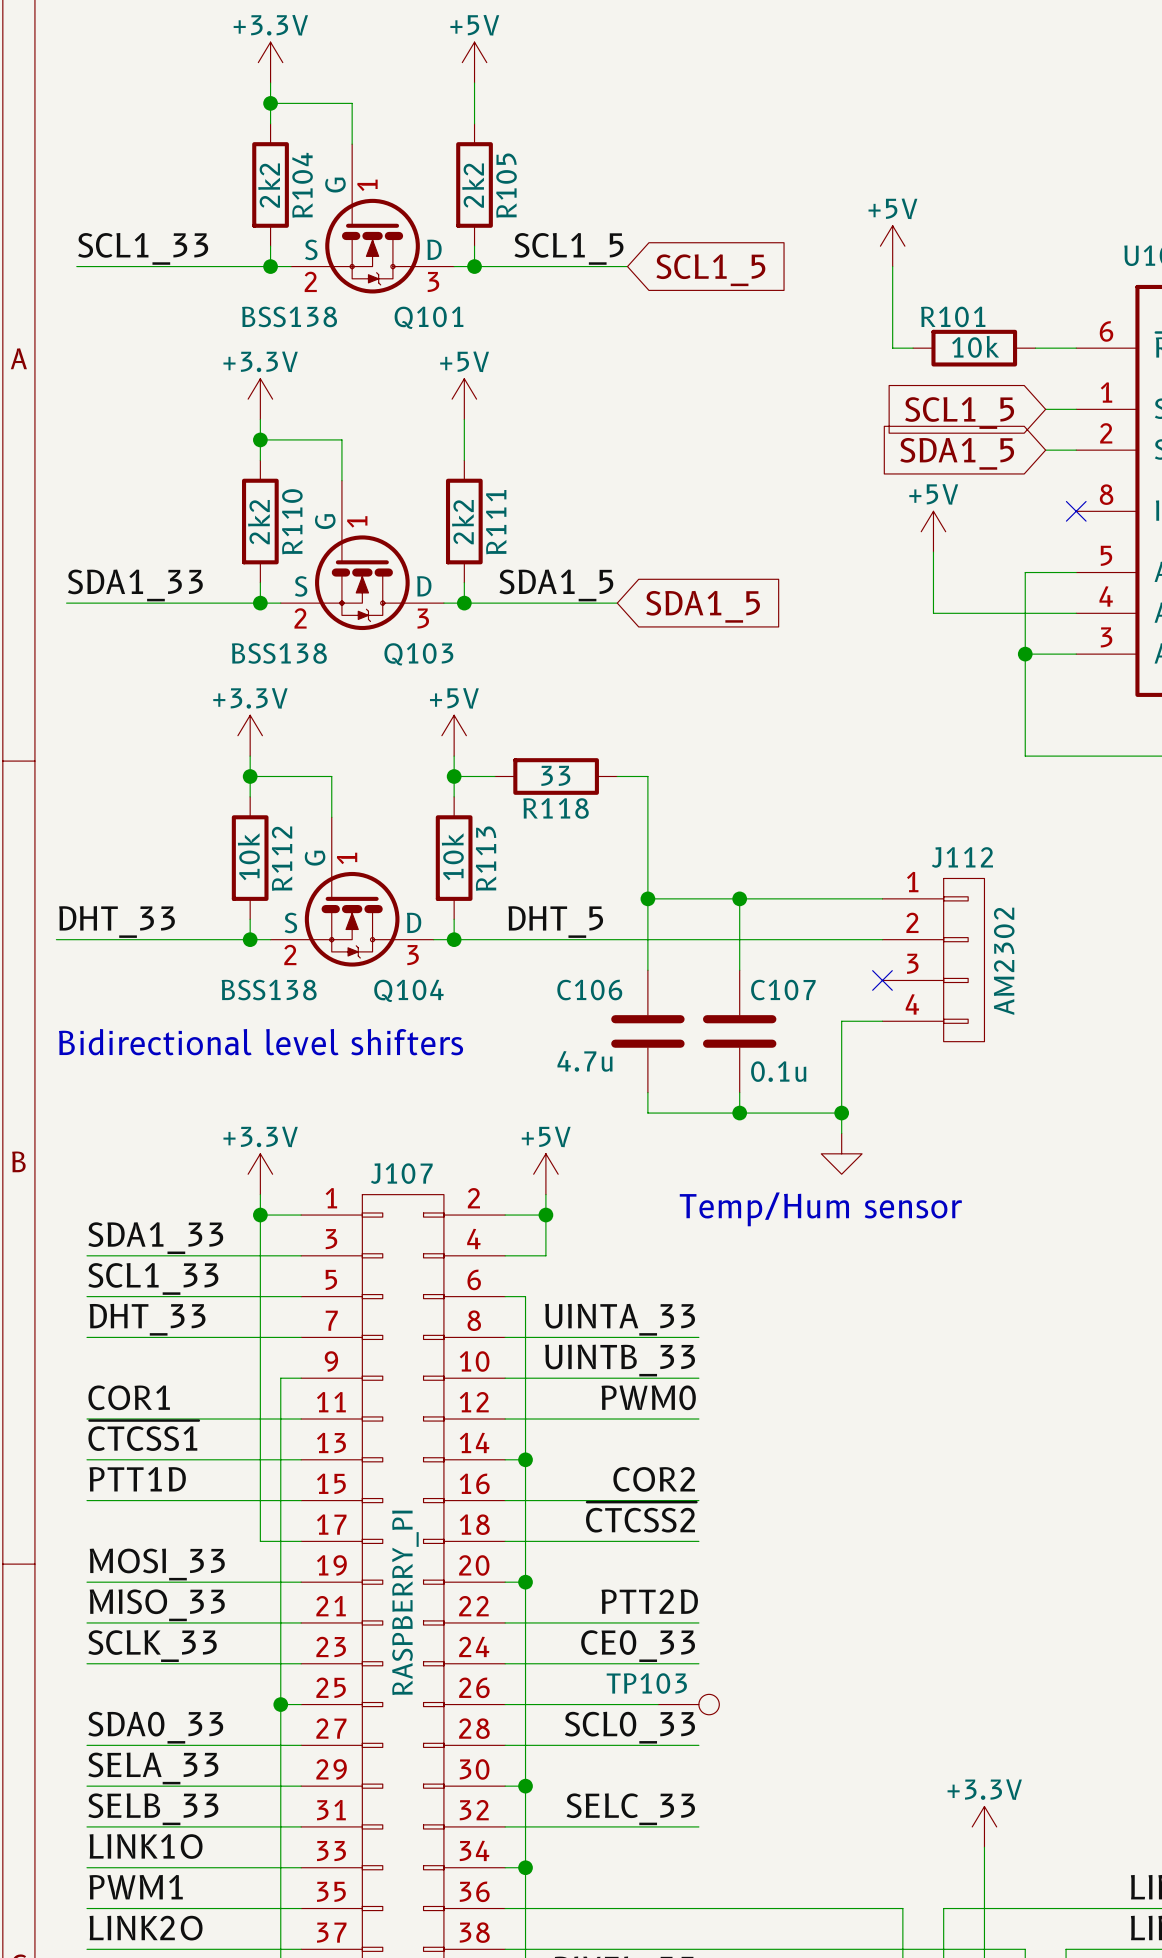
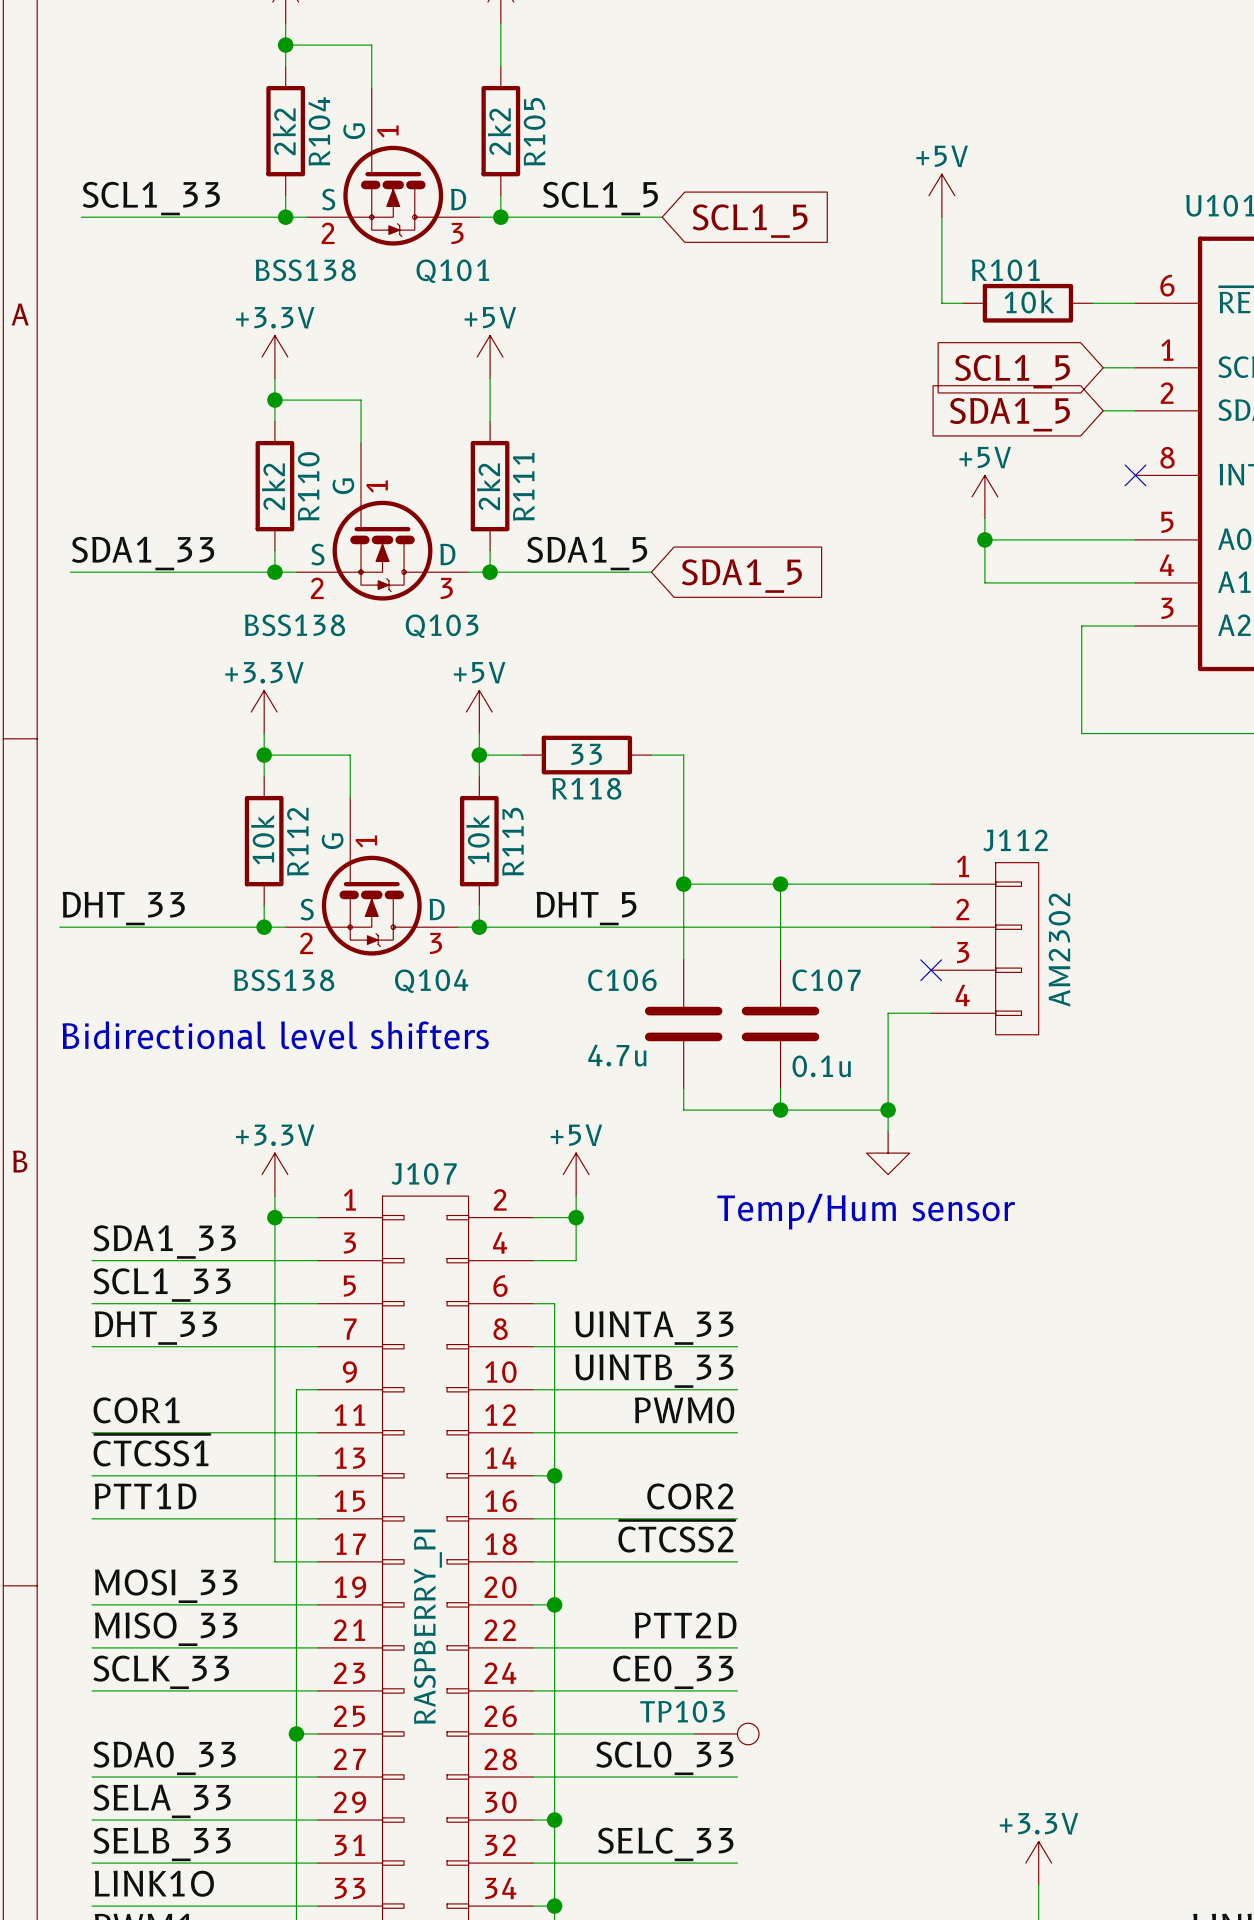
junction: none -> (984, 539)
wire: (1025, 572) (1025, 654) -> (1081, 539) (984, 539)
junction: (1025, 654) -> none

